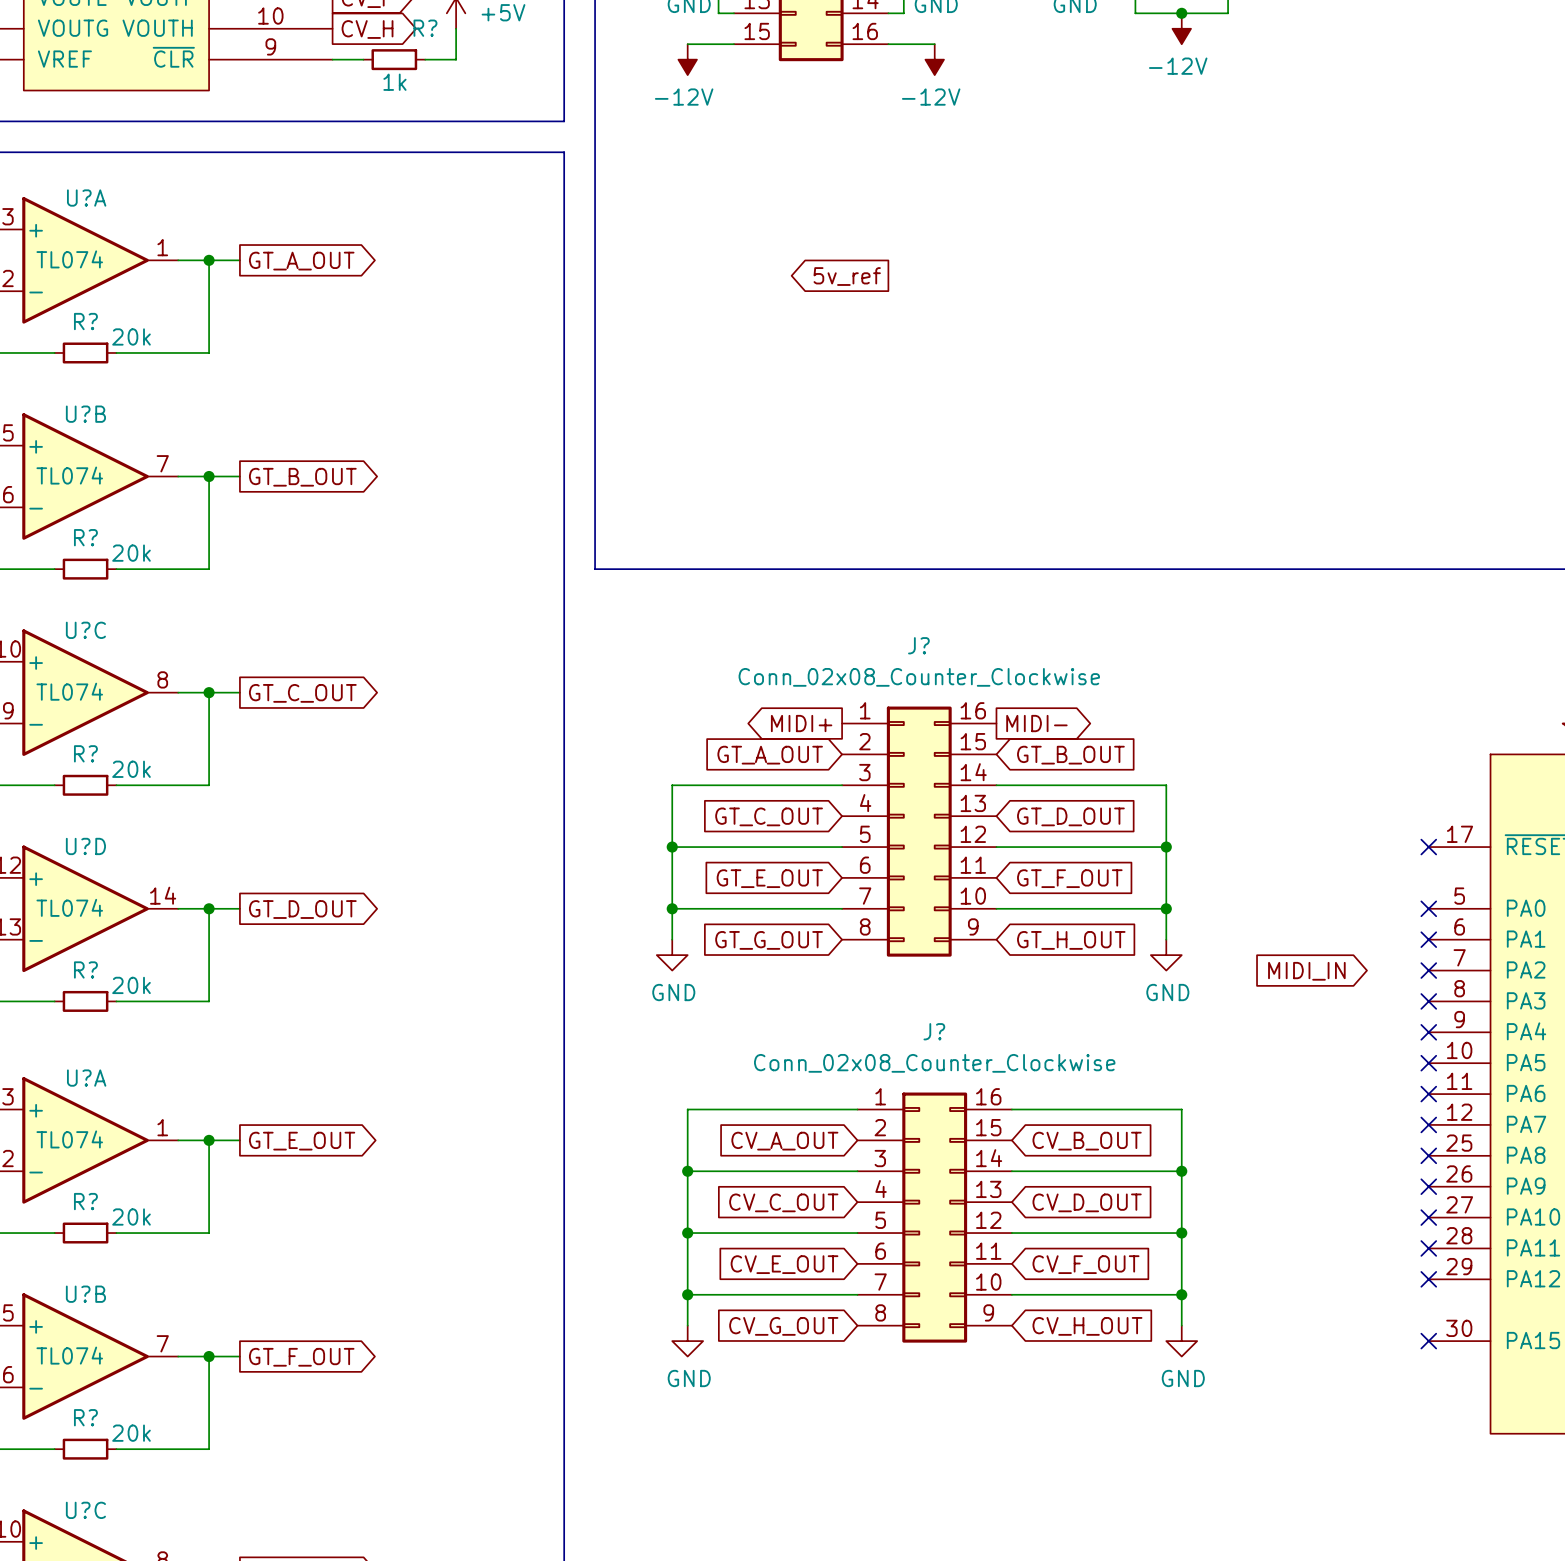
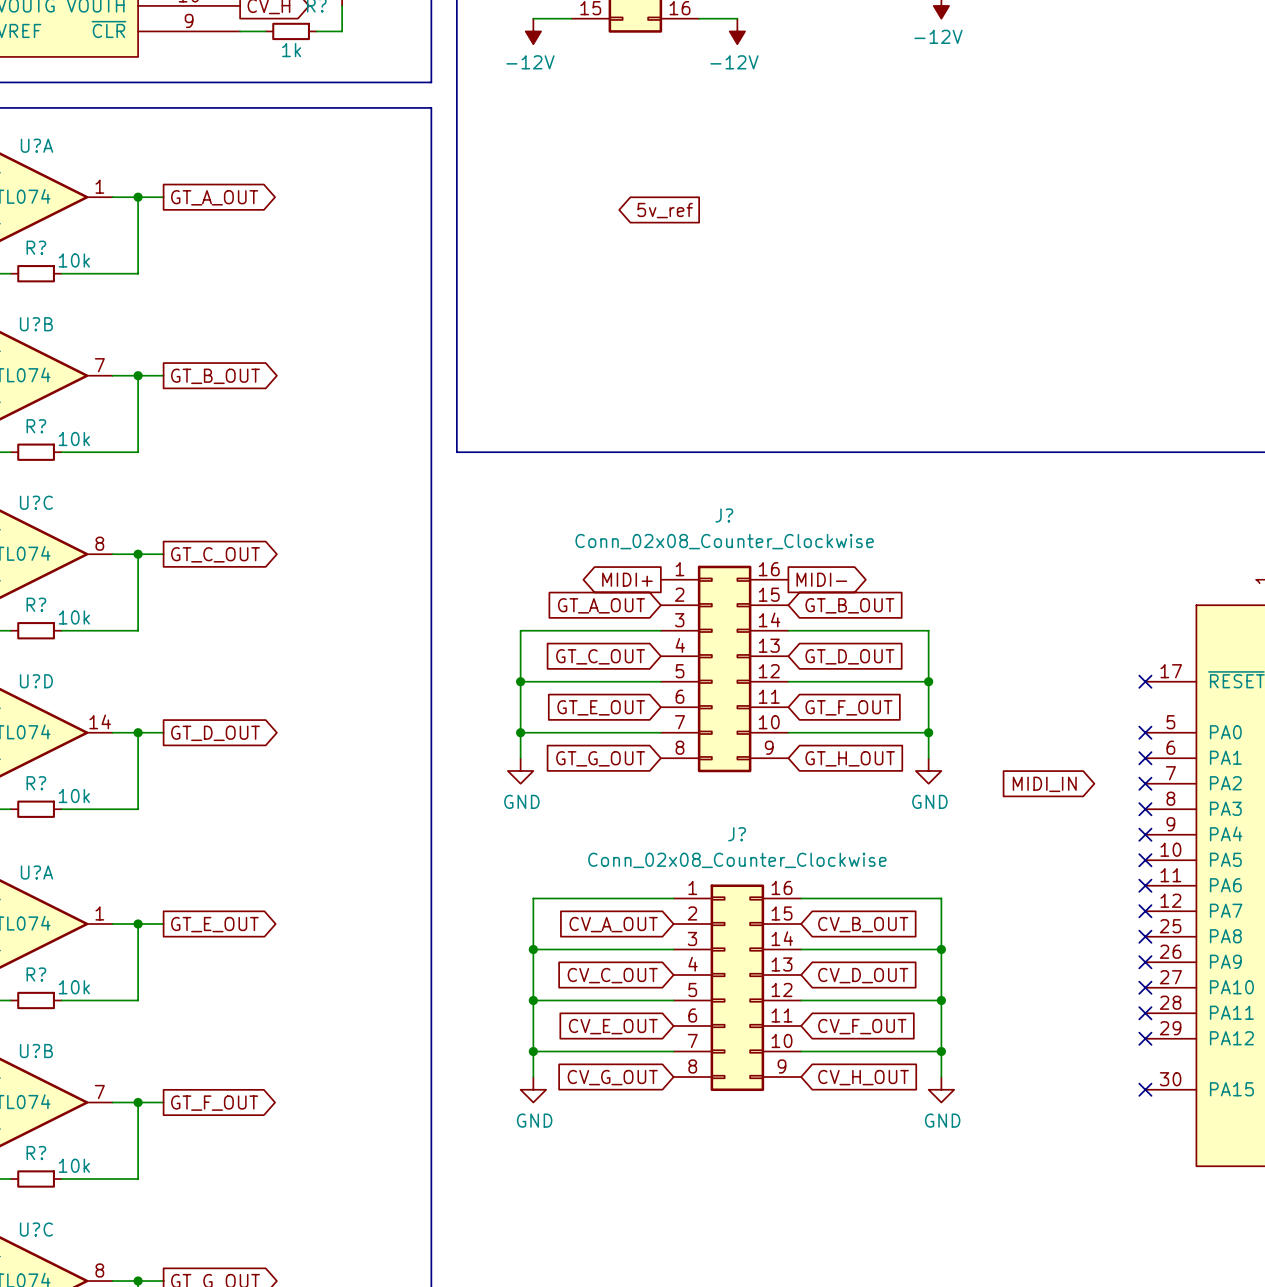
R? value: 20k (131, 336) -> 10k (74, 260)
R? value: 20k (131, 553) -> 10k (74, 438)
R? value: 20k (131, 769) -> 10k (74, 617)
R? value: 20k (131, 985) -> 10k (74, 796)
R? value: 20k (131, 1217) -> 10k (74, 987)
R? value: 20k (131, 1433) -> 10k (74, 1165)

